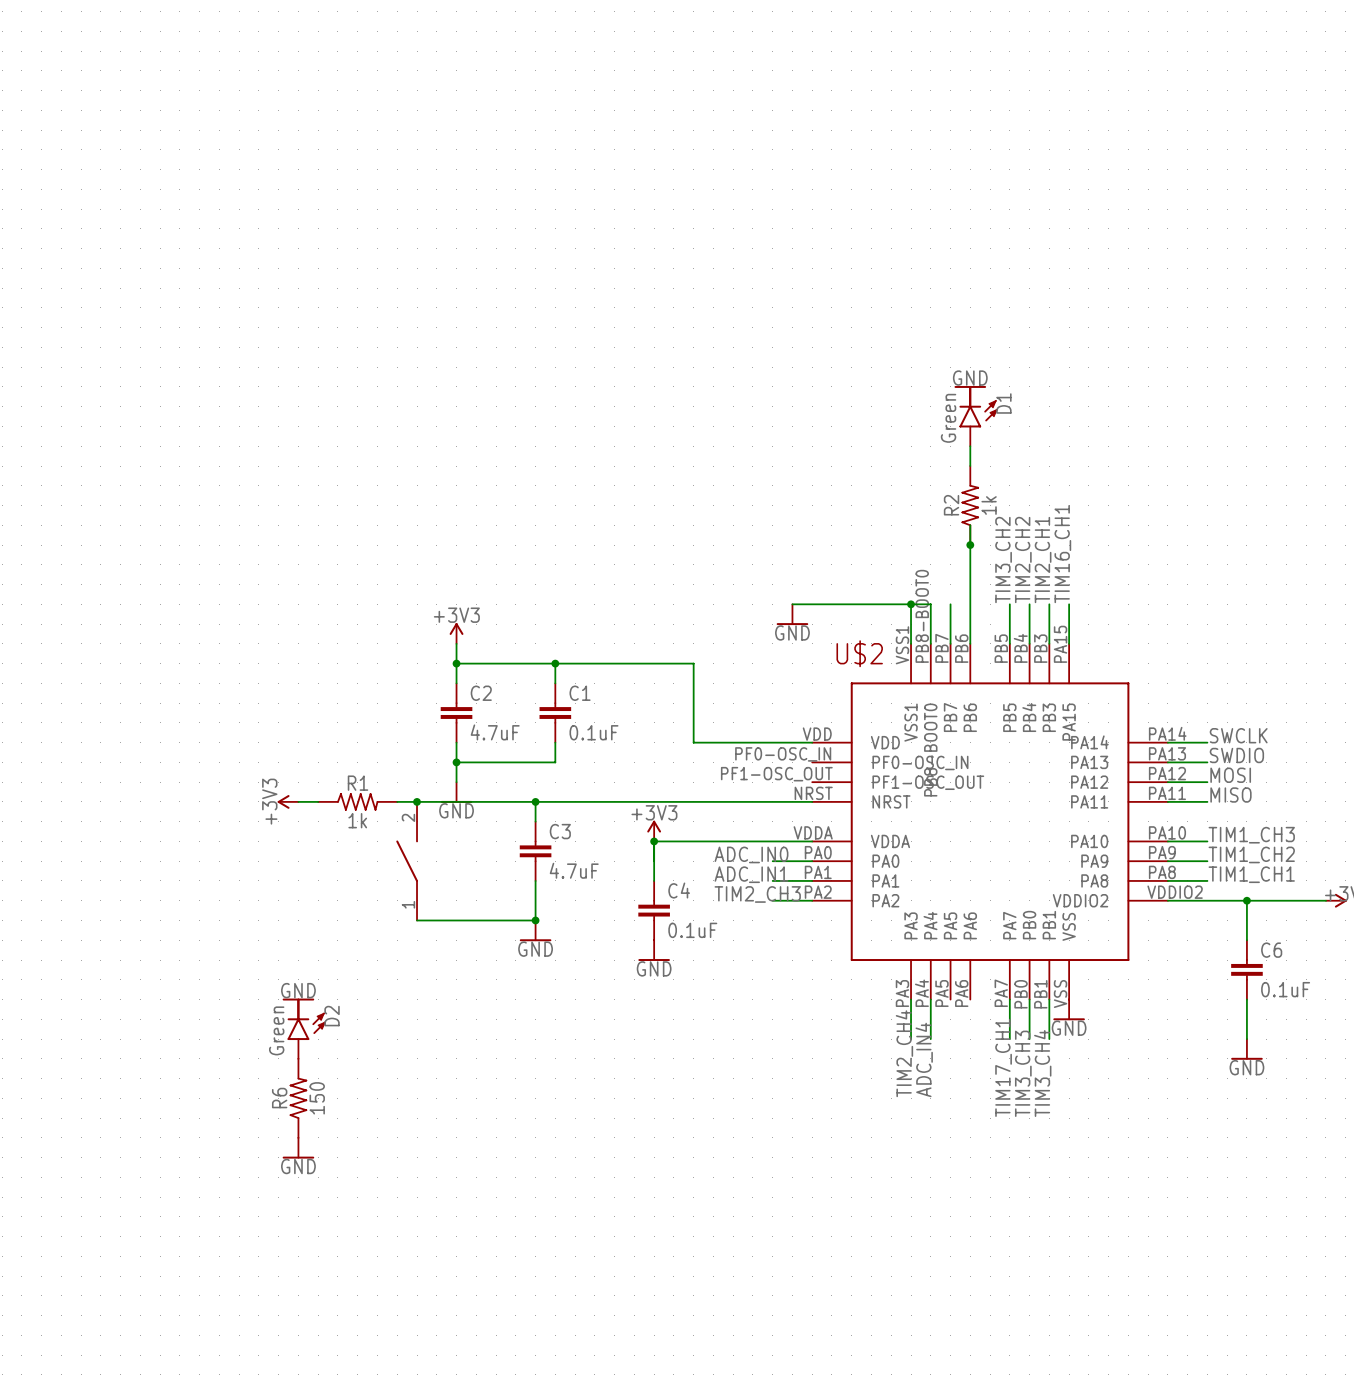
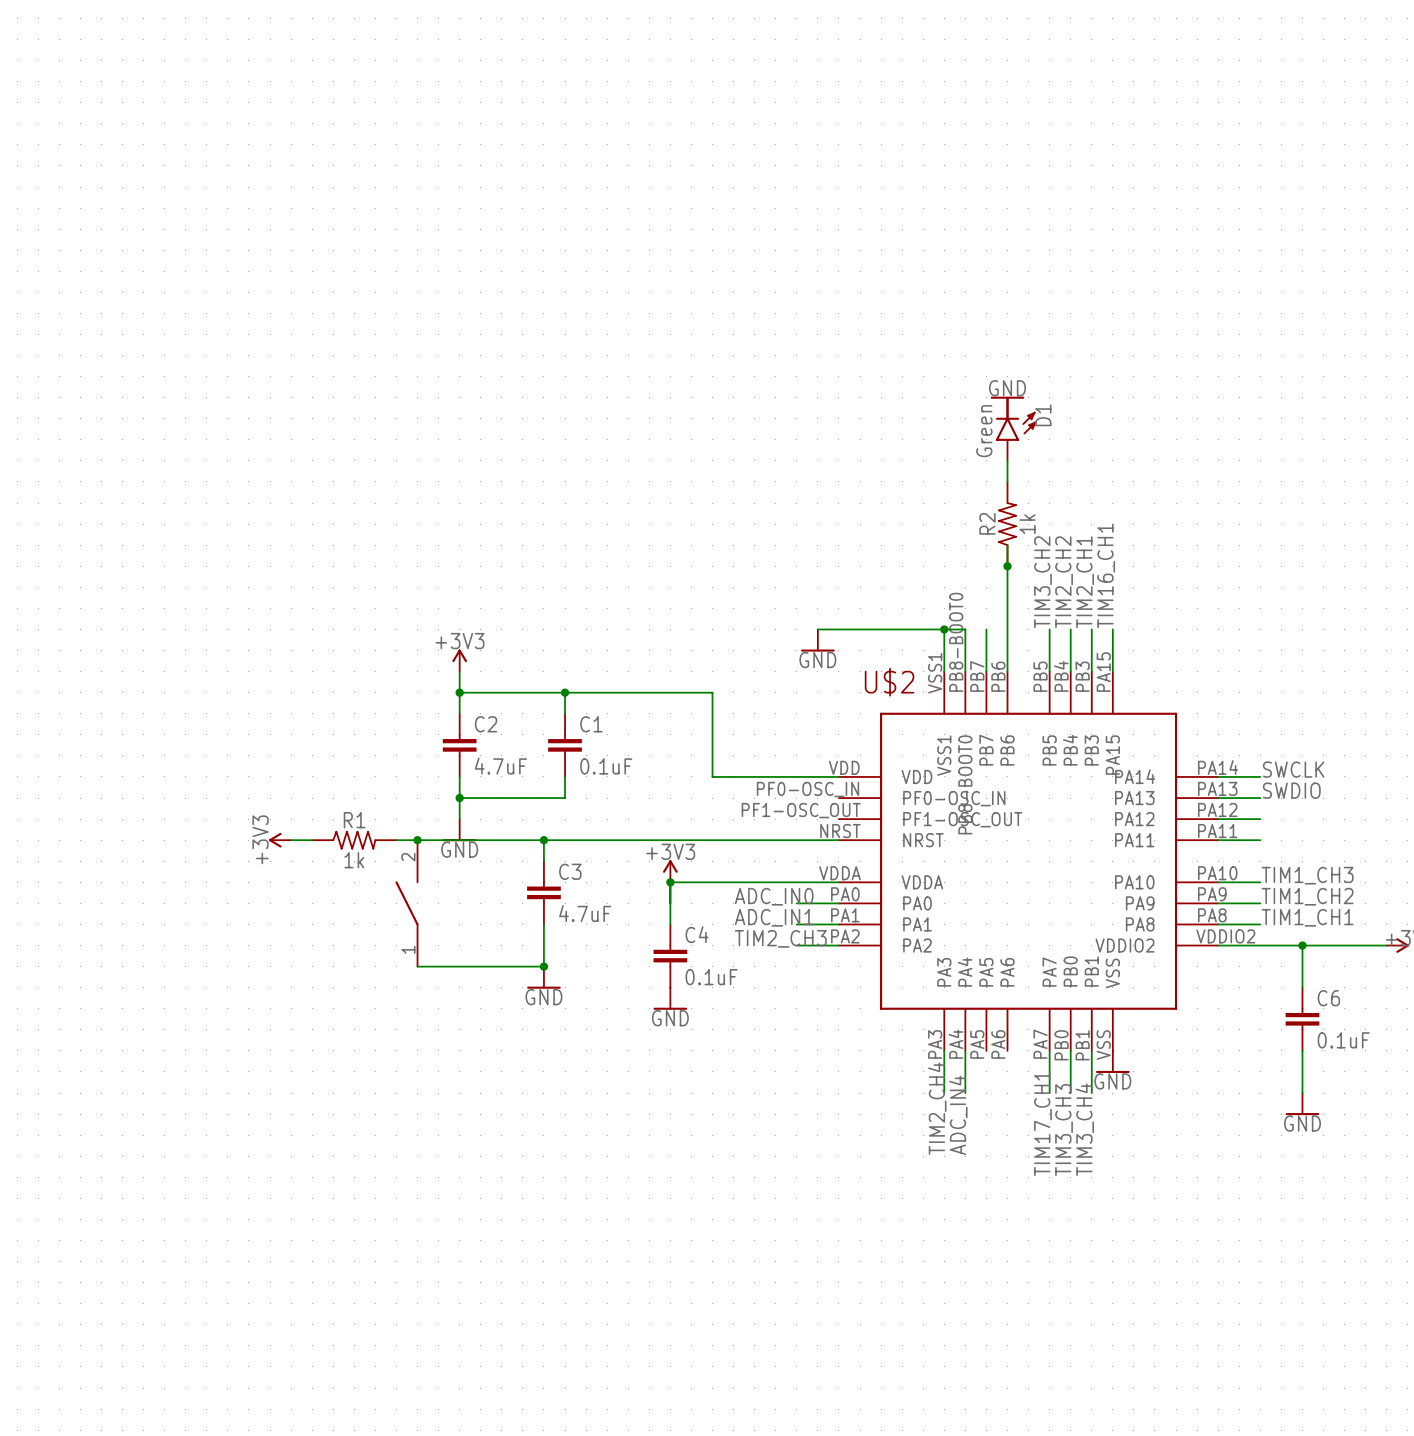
label: MOSI (1230, 775) -> none
label: MISO (1230, 795) -> none
power symbol: GND (298, 1008) -> none
D2: Green (306, 1029) -> none
R6: 150 (298, 1098) -> none
power symbol: GND (298, 1148) -> none

